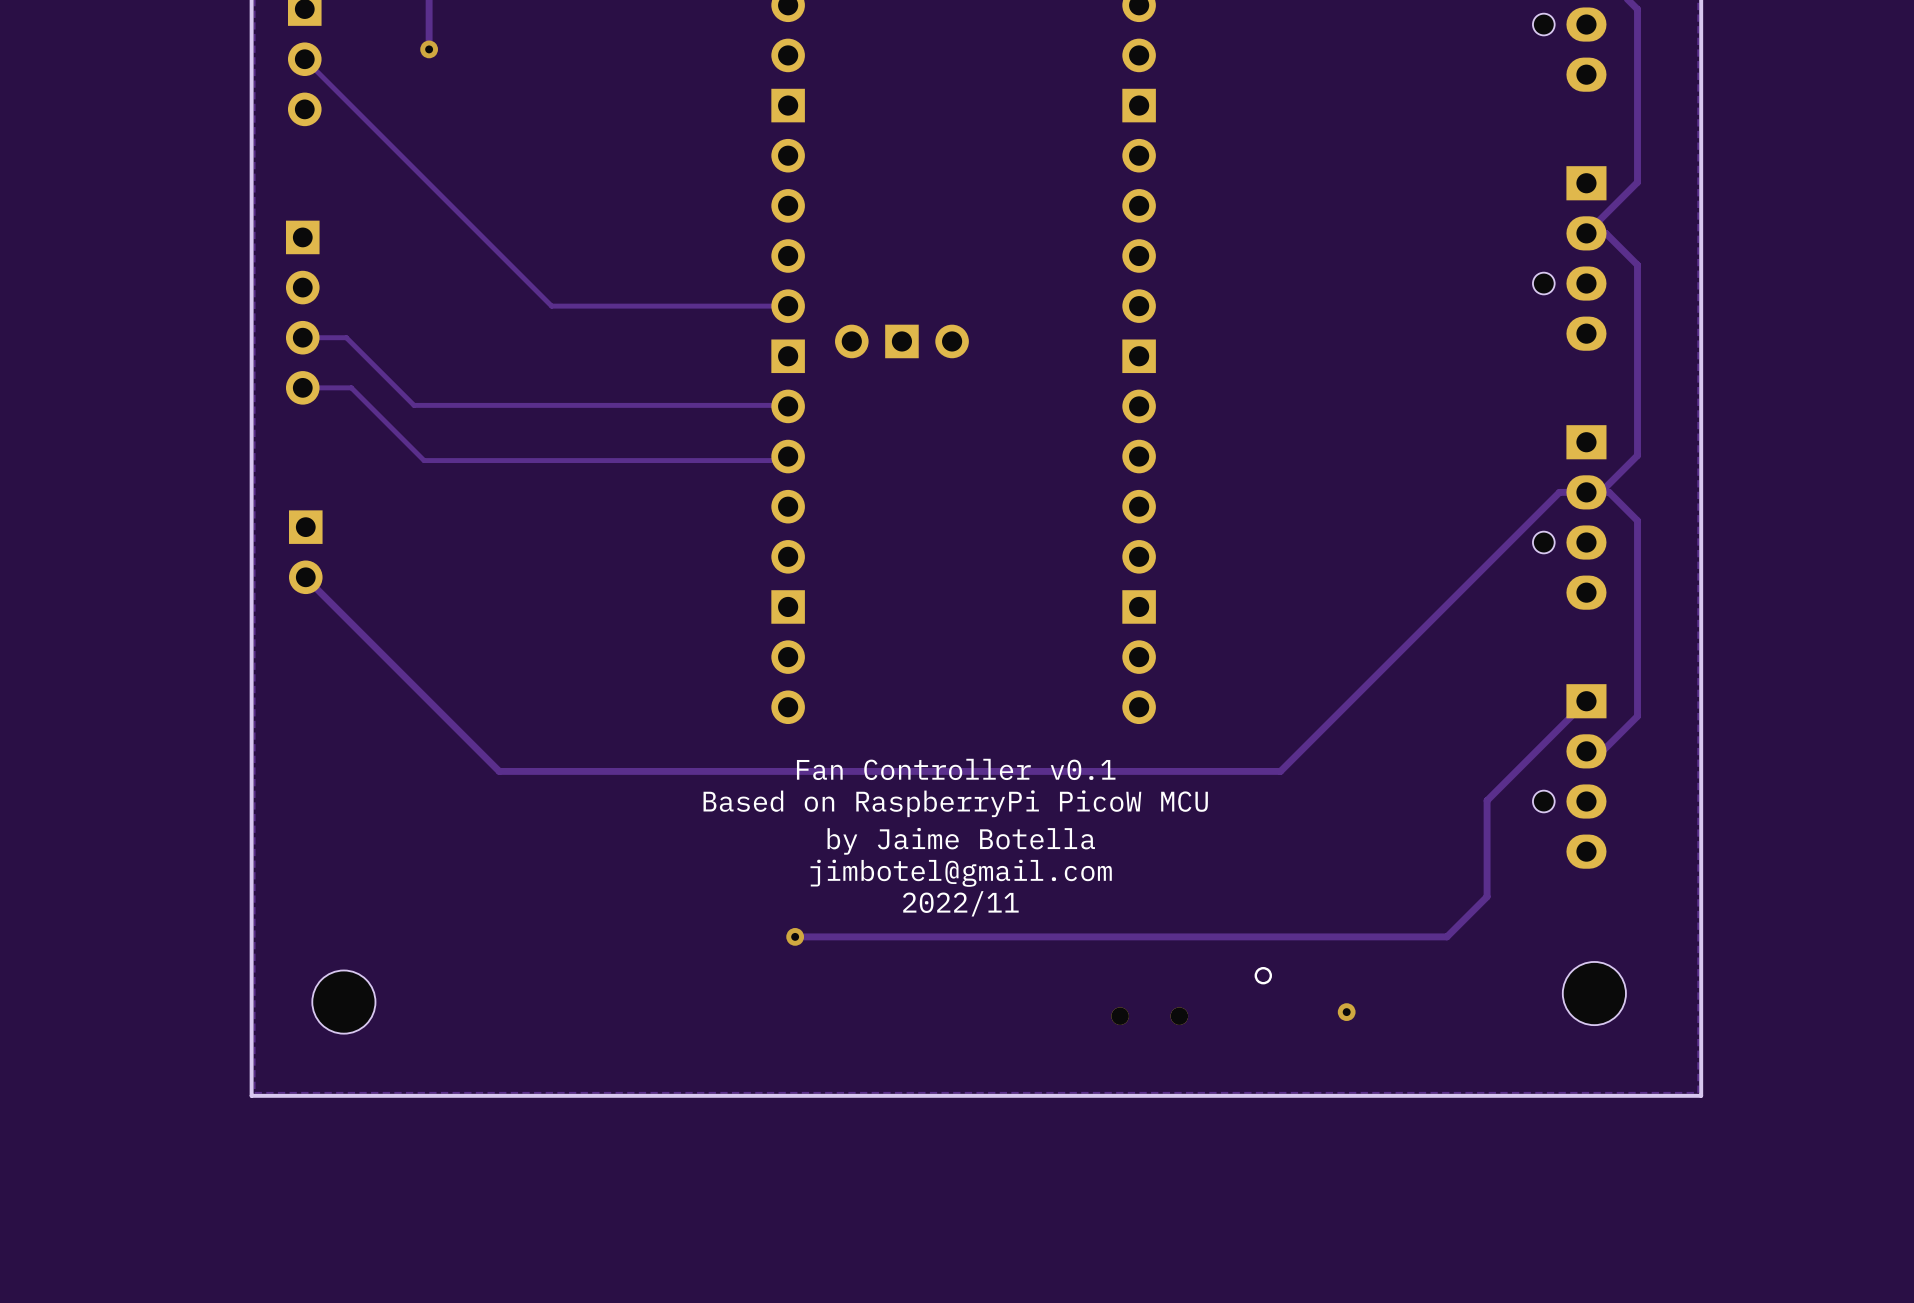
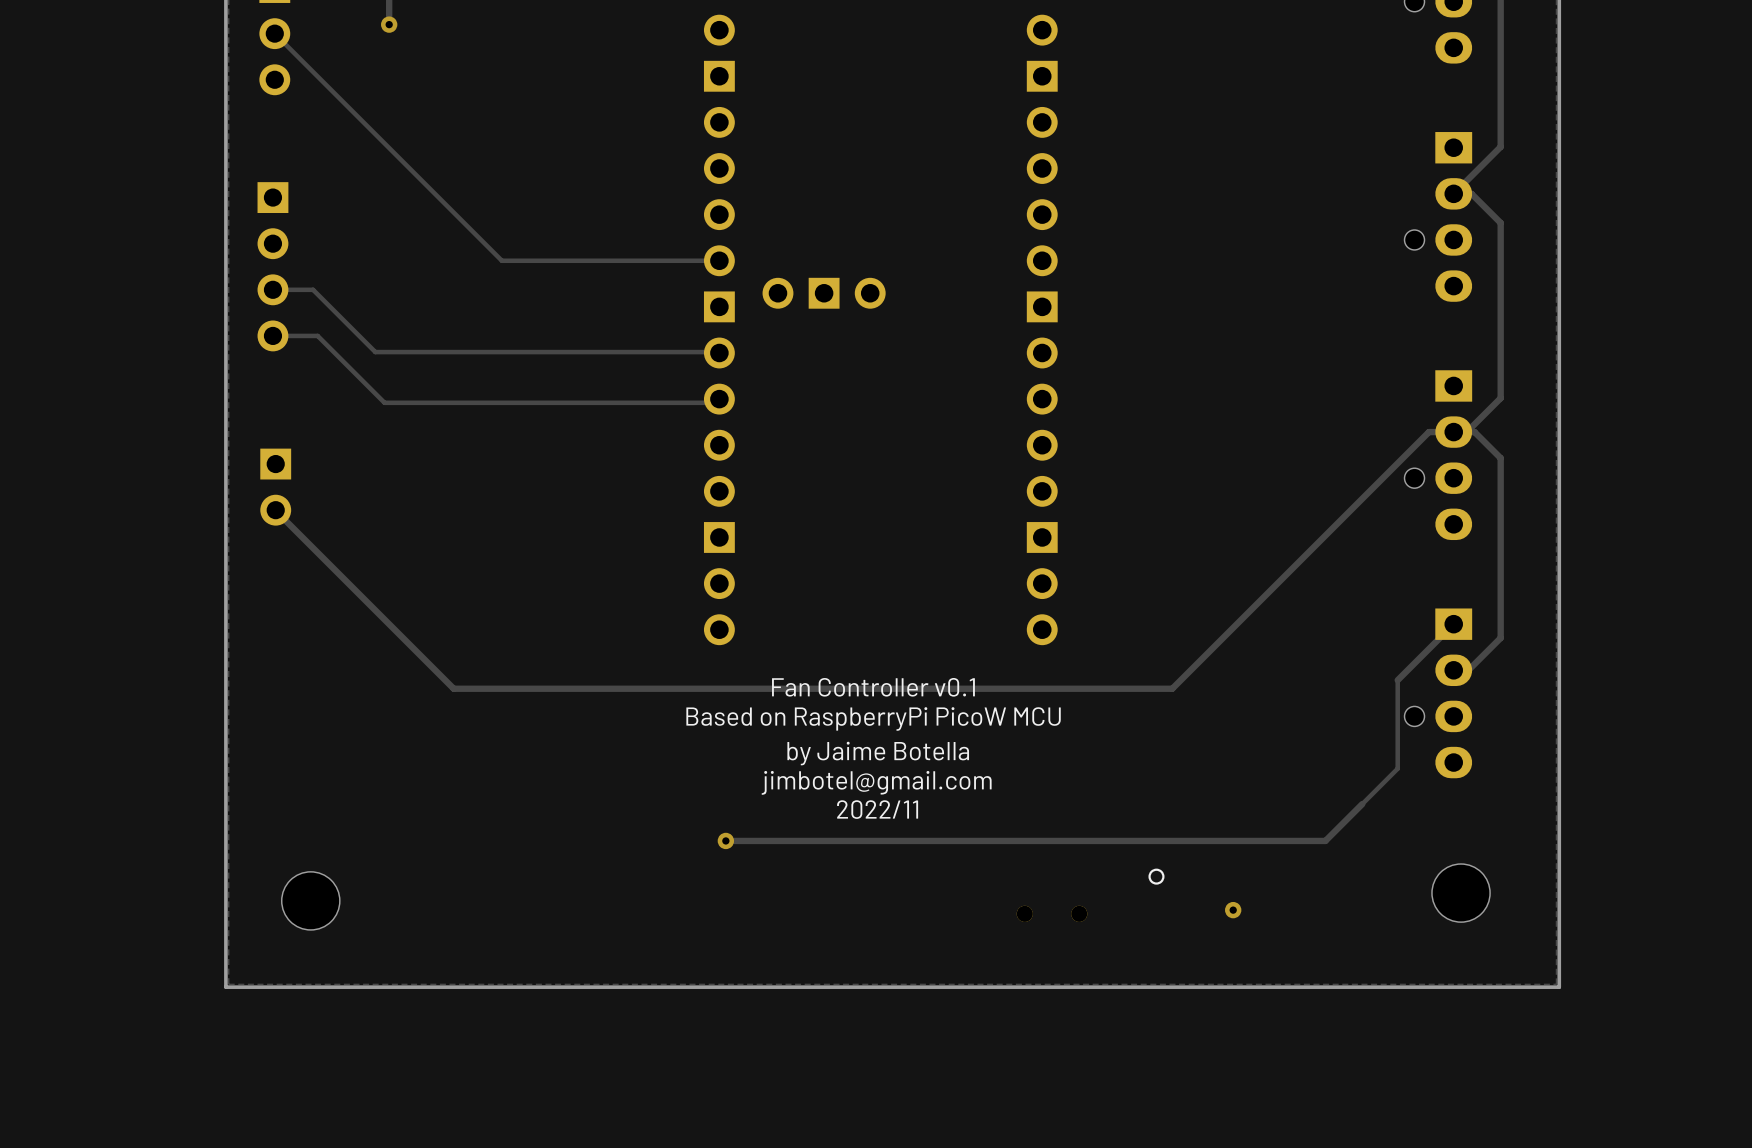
track: (1525, 762) (1487, 800) (1487, 896) -> (1397, 680) (1397, 768) (1362, 804)

